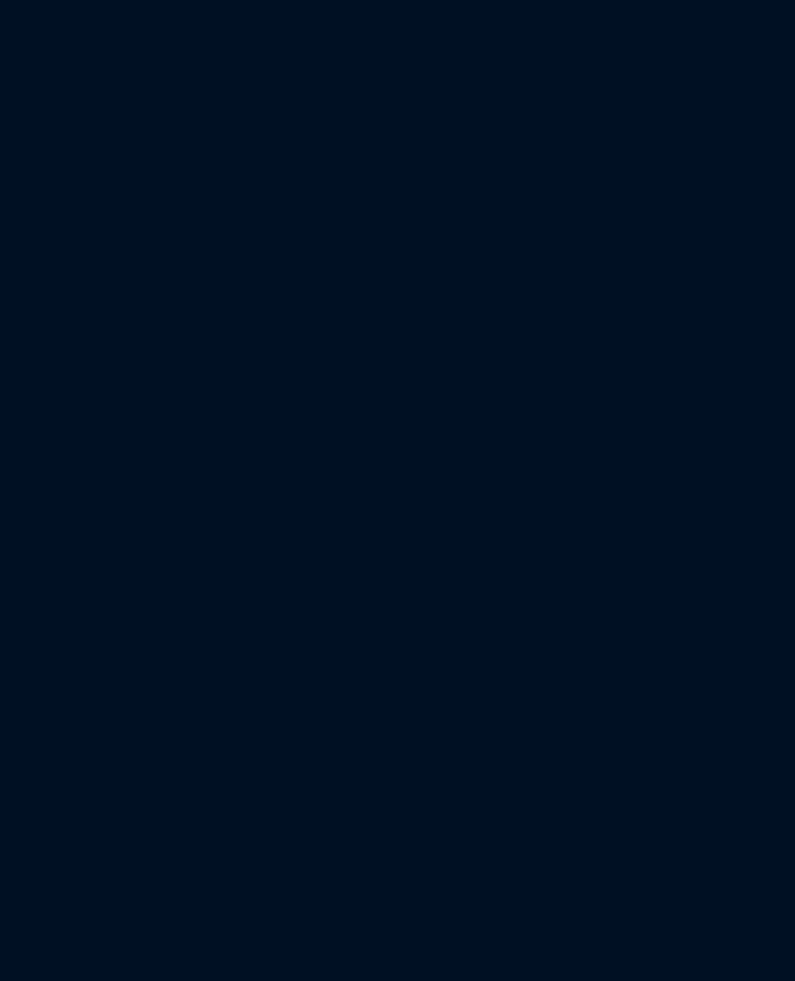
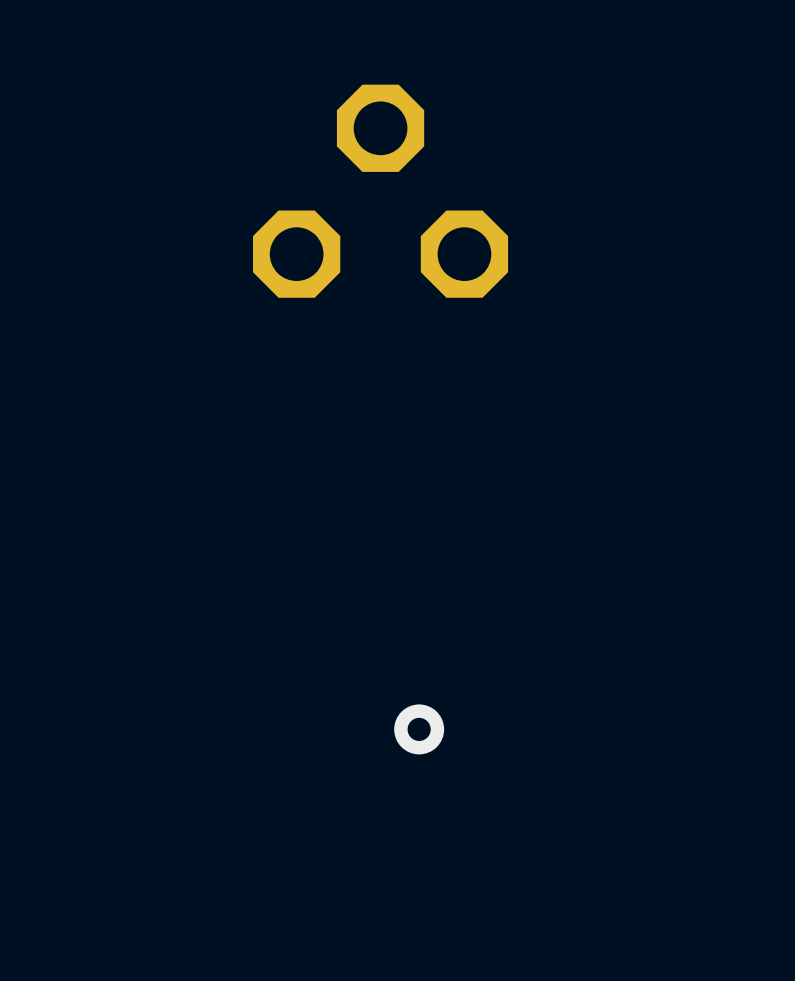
part: none -> (380, 191)
via: none -> (419, 729)

